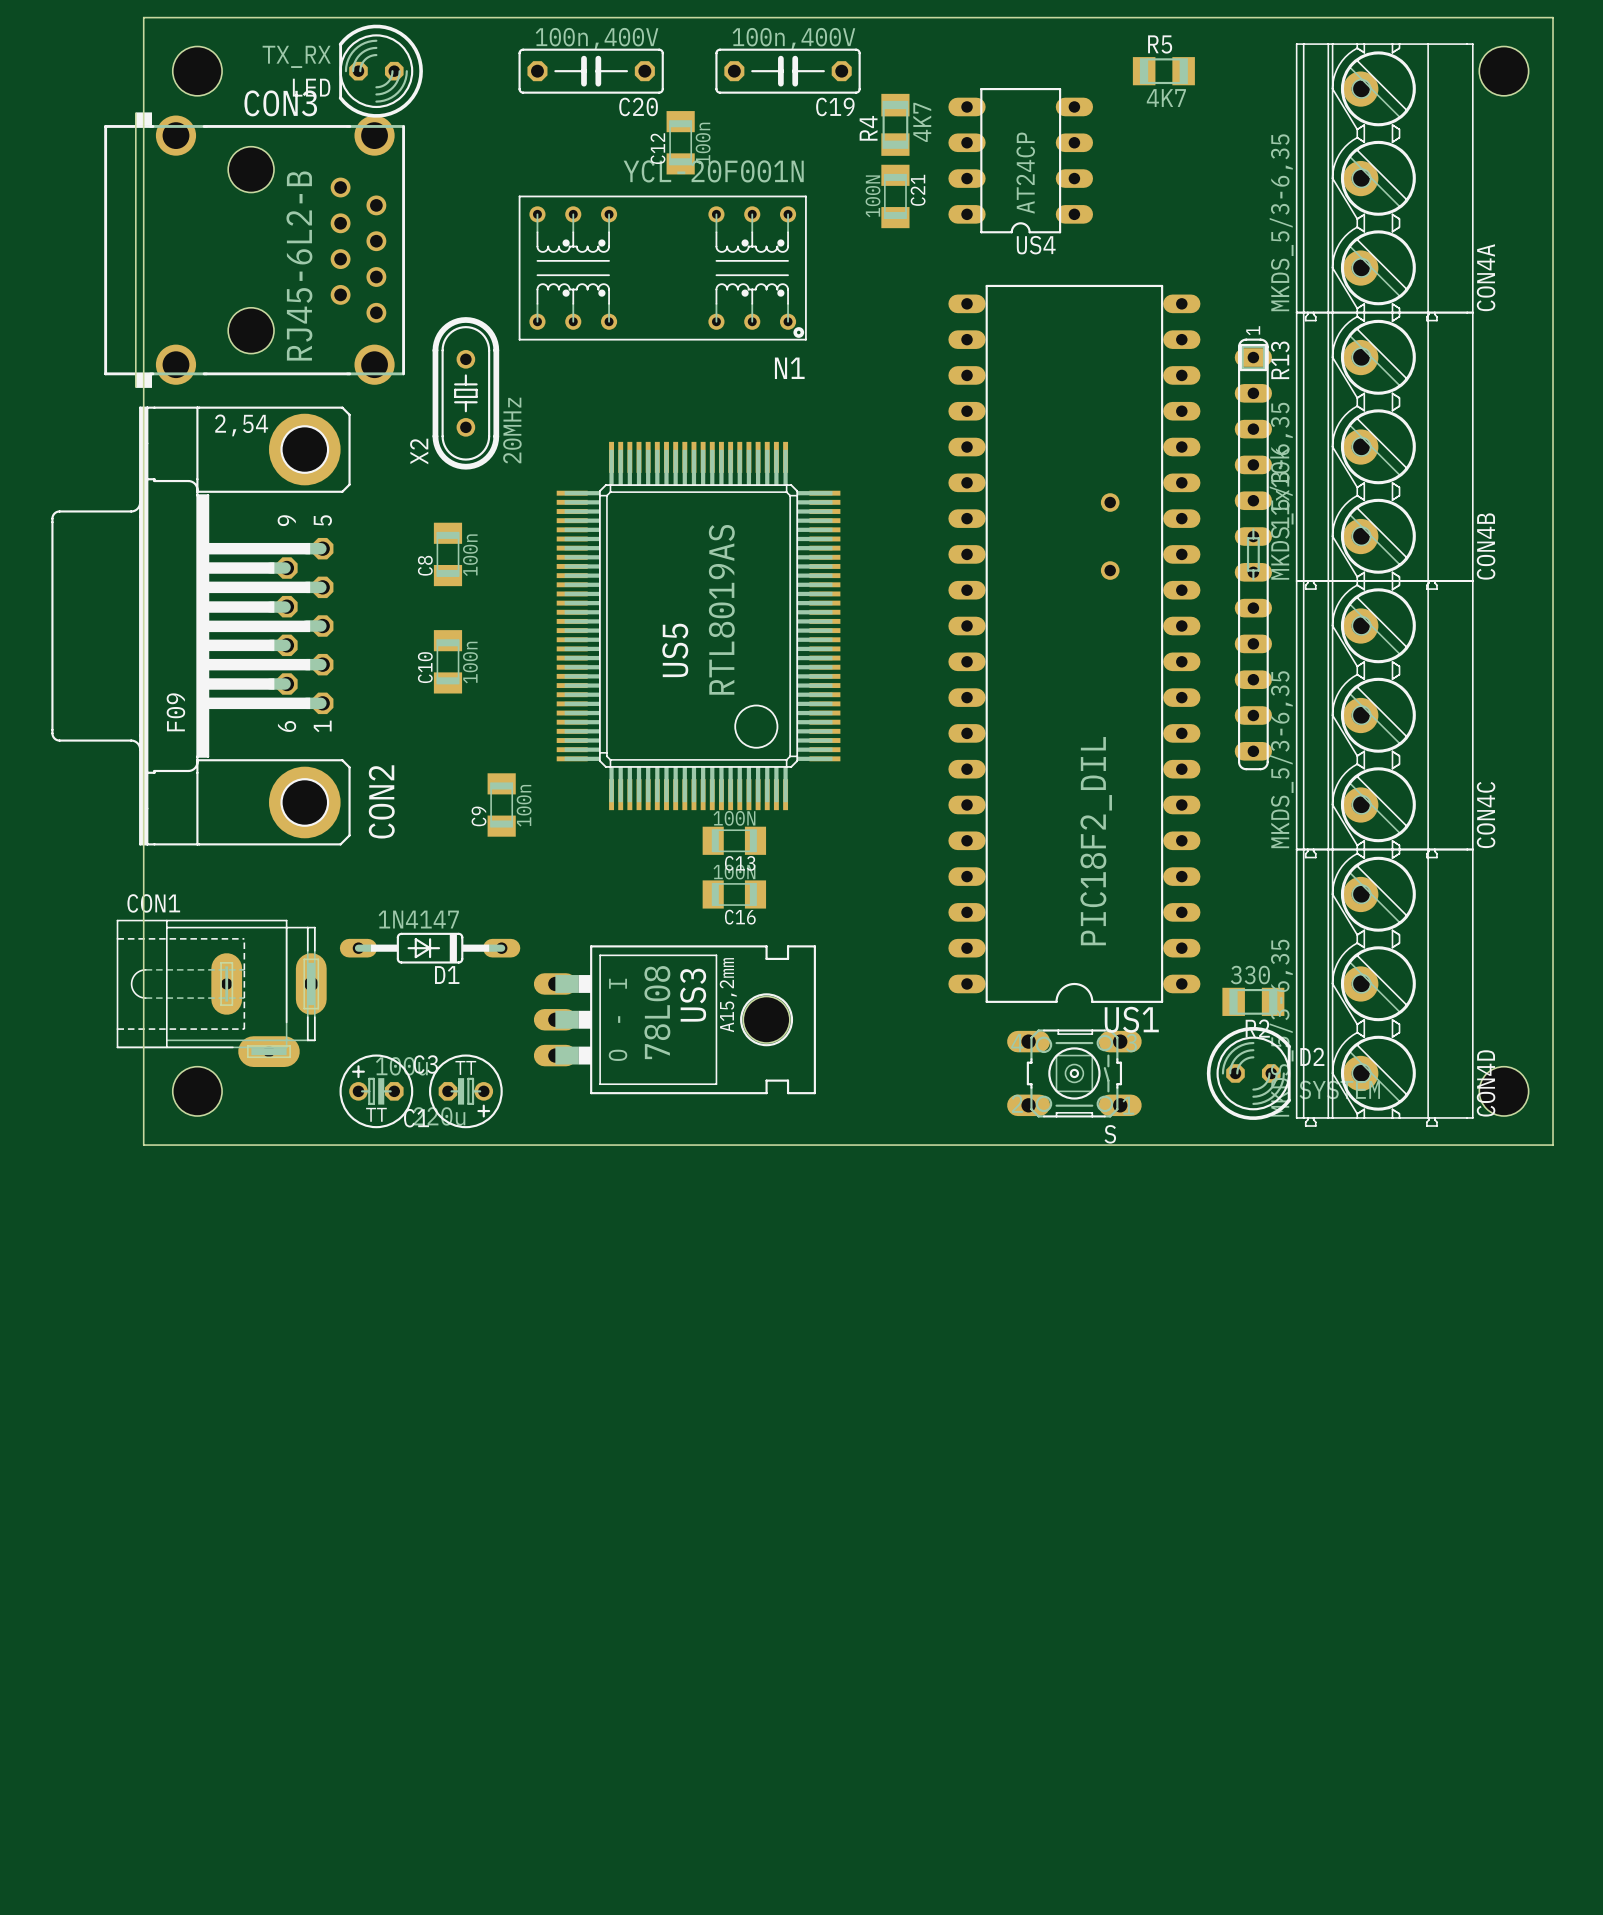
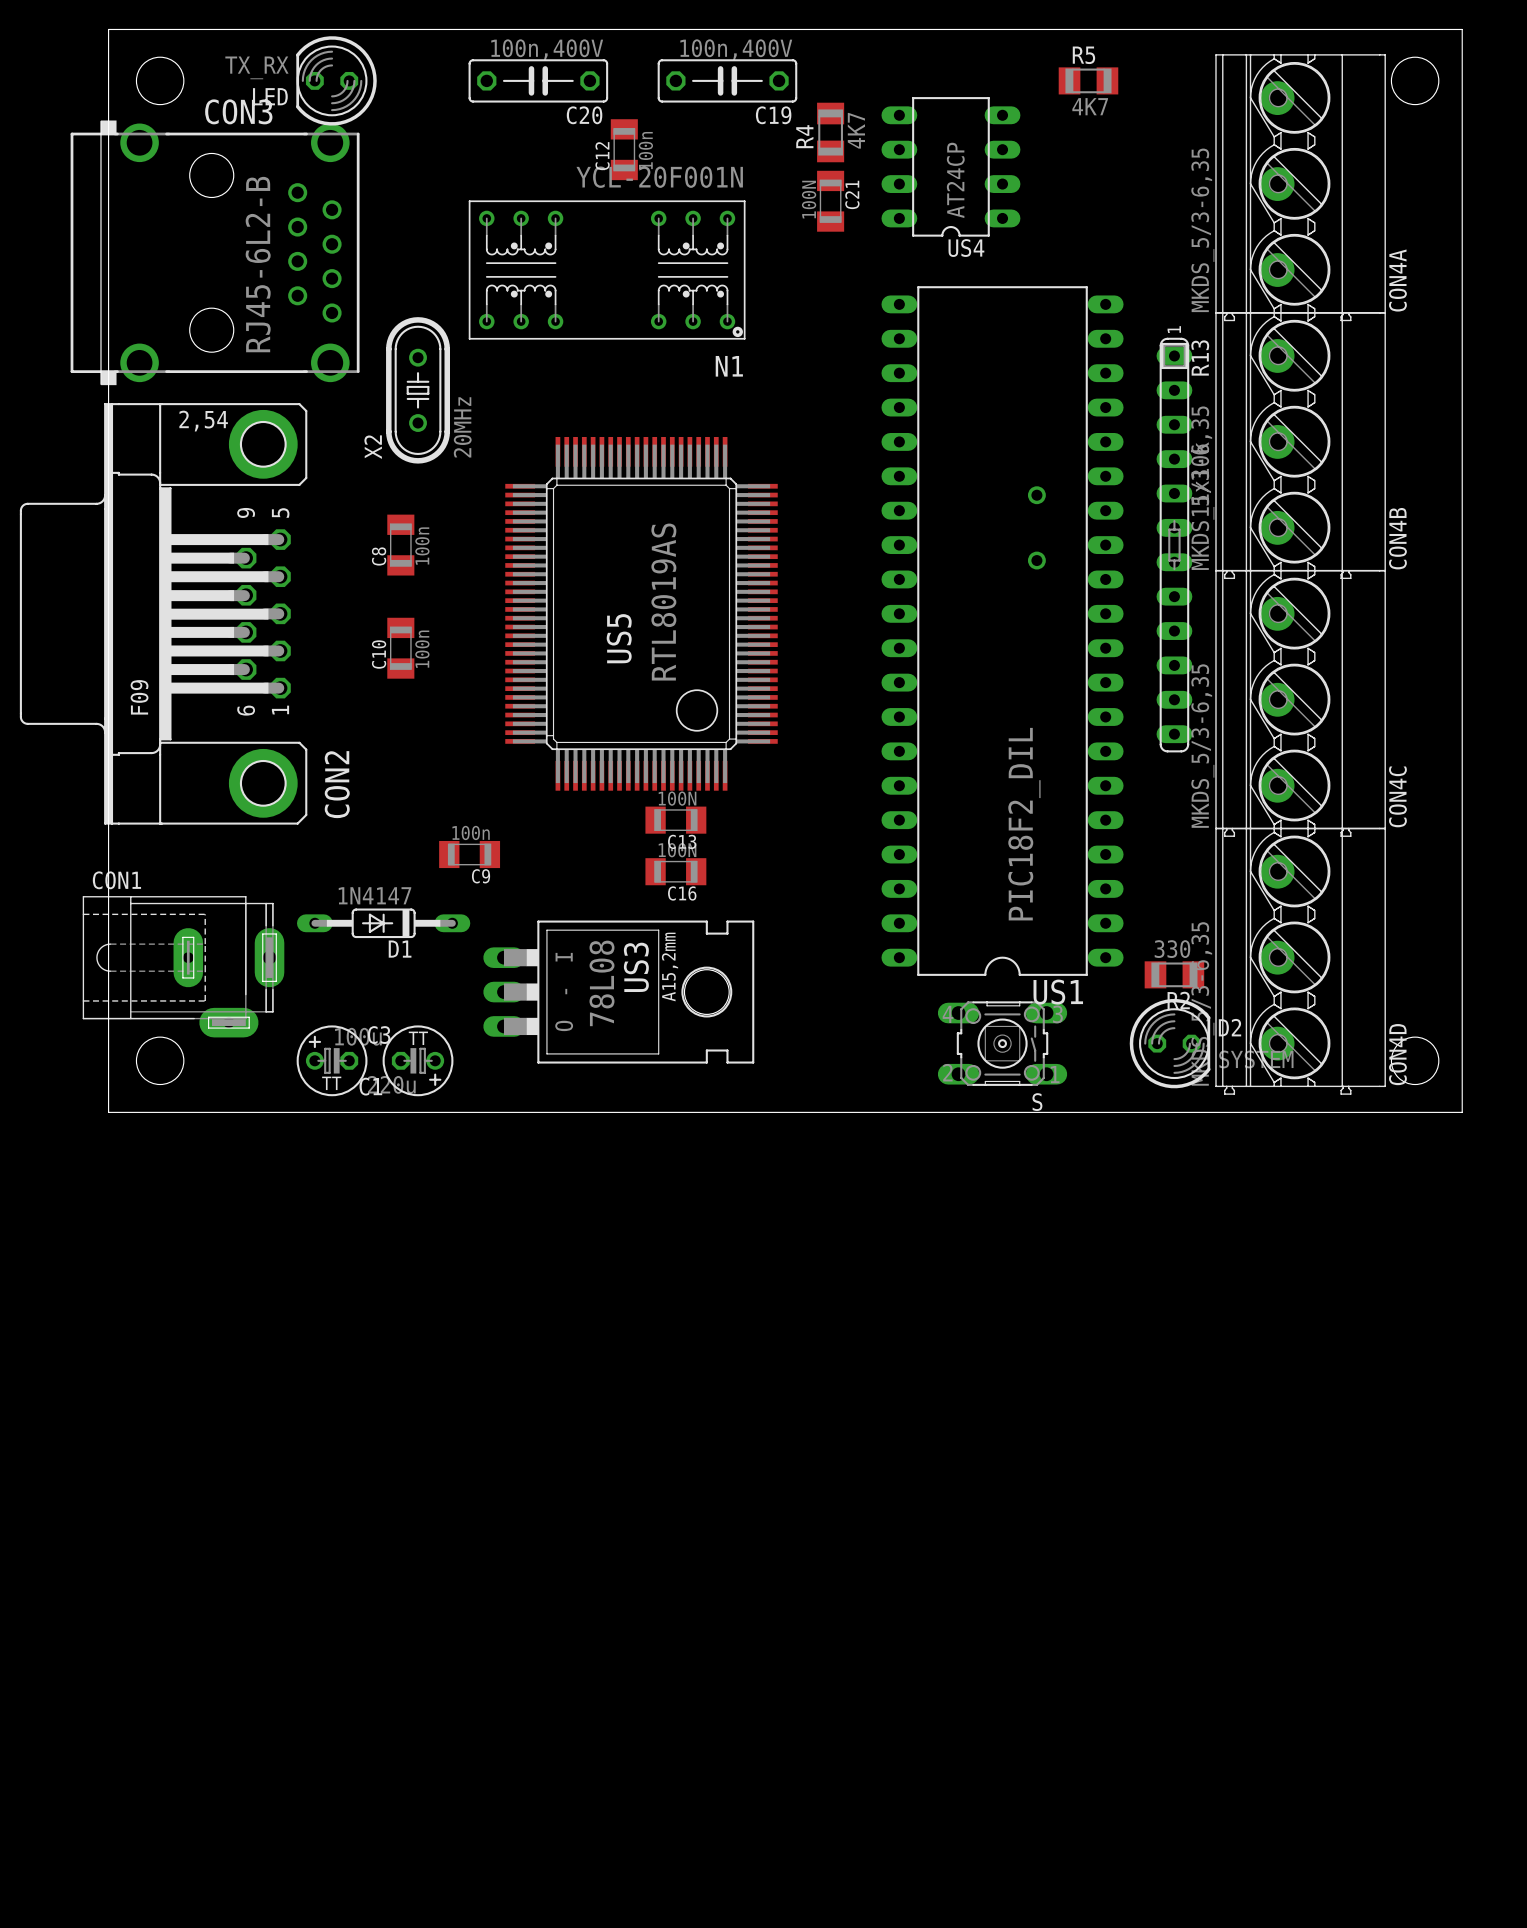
C9 rotation: 0° (501, 804) -> 90° clockwise (469, 854)
C9 position: (501, 804) -> (469, 854)
C9 value position: 100n (524, 805) -> 100n (471, 832)
C9 name position: C9 (479, 816) -> C9 (481, 876)

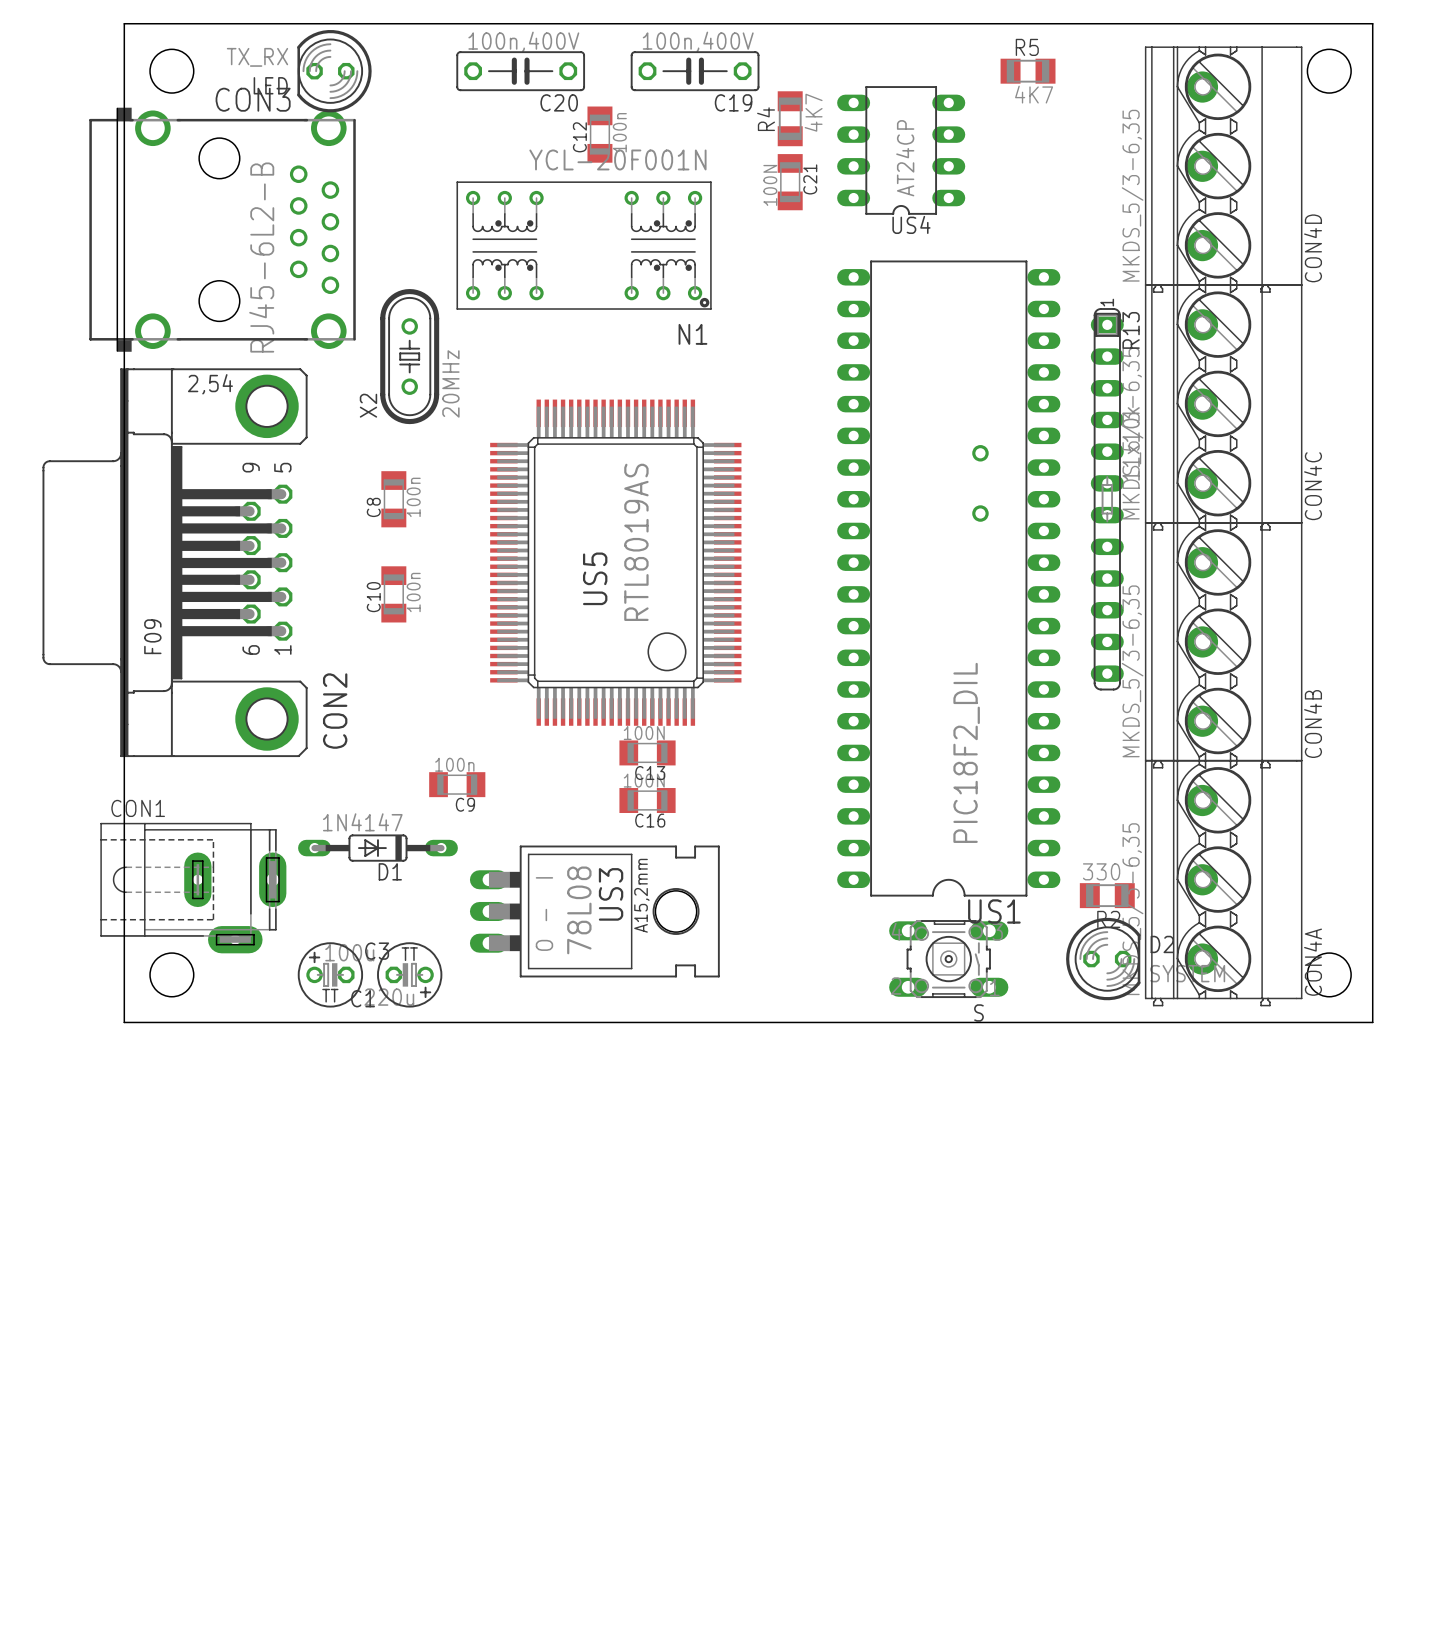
CON4A name: CON4A (1397, 280) -> CON4D (1313, 248)
CON4B name: CON4B (1397, 538) -> CON4C (1313, 486)
CON4C name: CON4C (1397, 796) -> CON4B (1313, 724)
CON4D name: CON4D (1397, 1054) -> CON4A (1313, 962)

